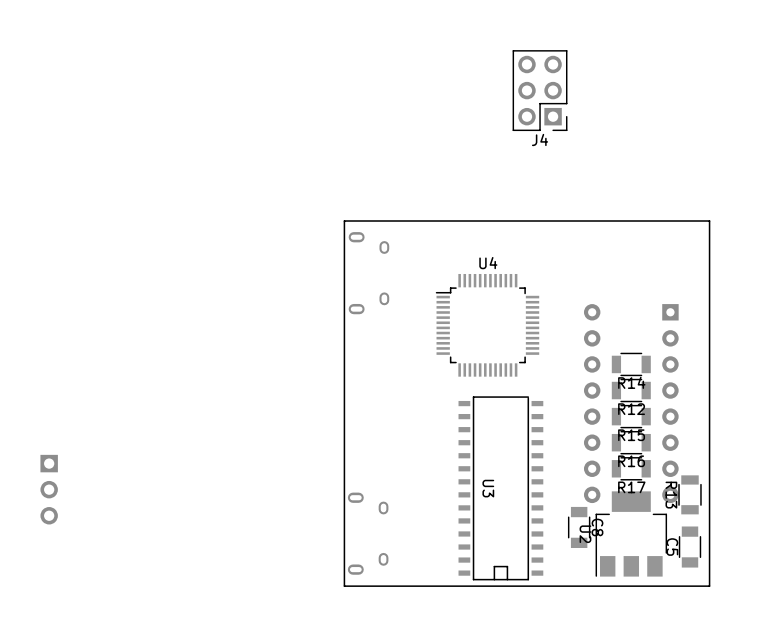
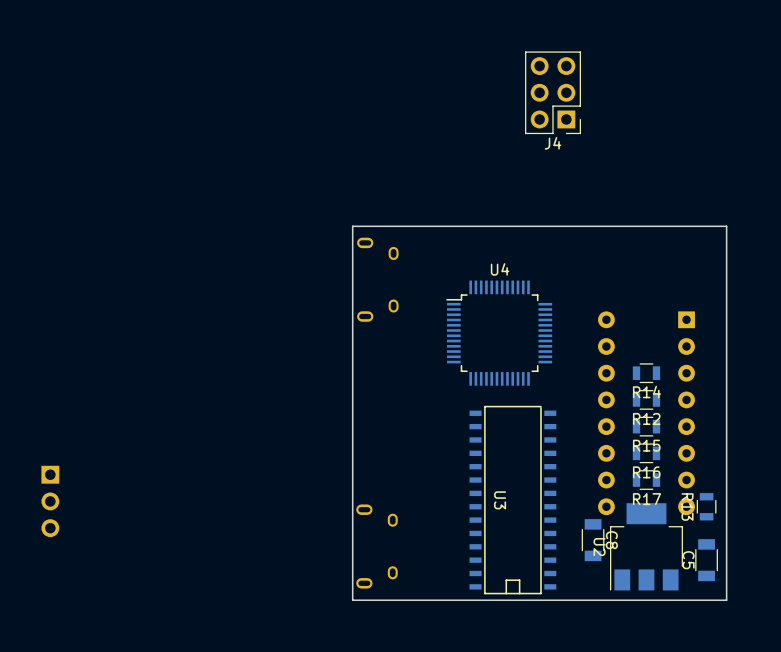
R14 footprint: [611, 352, 651, 377] -> [632, 363, 661, 384]
R12 footprint: [611, 378, 651, 403] -> [632, 390, 661, 410]
R15 footprint: [611, 405, 651, 429] -> [632, 416, 661, 437]
R16 footprint: [611, 431, 651, 455] -> [632, 443, 661, 464]
R17 footprint: [611, 457, 651, 481] -> [632, 470, 661, 490]
R13 footprint: [678, 475, 702, 515] -> [696, 493, 717, 521]

